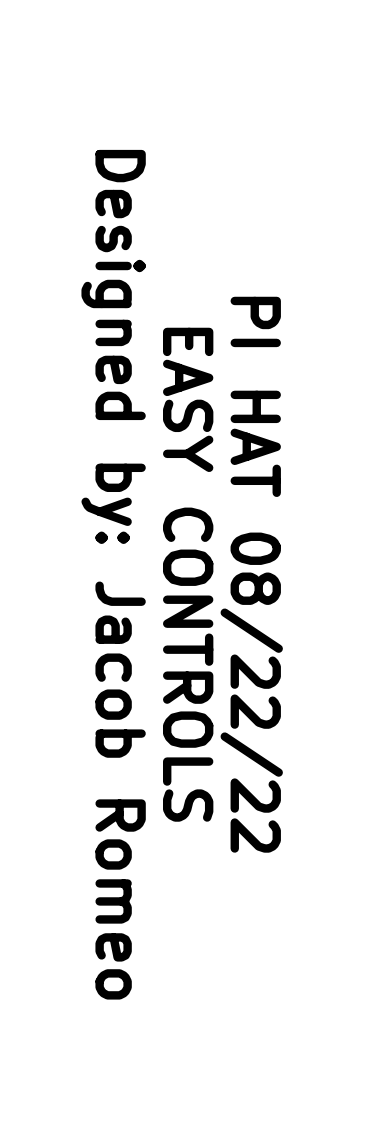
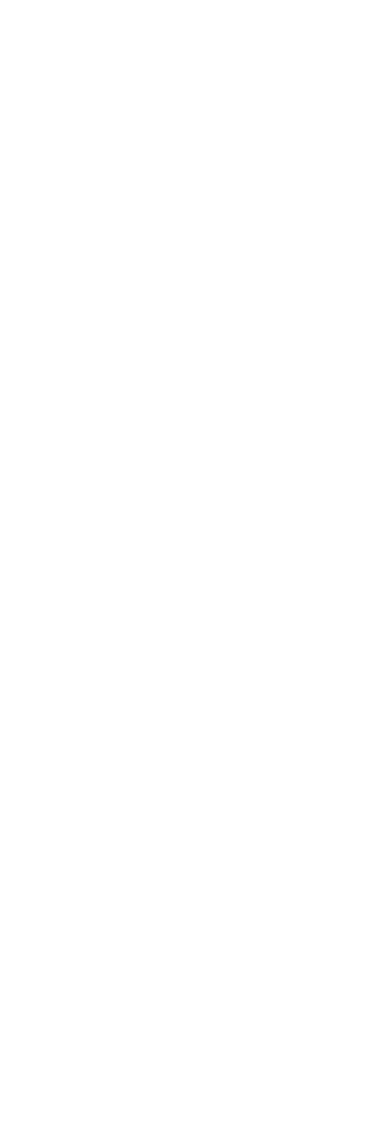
text: Designed by: Jacob Romeo (113, 574) -> none
text: EASY CONTROLS (188, 574) -> none
text: PI HAT 08/22/22 (251, 574) -> none

